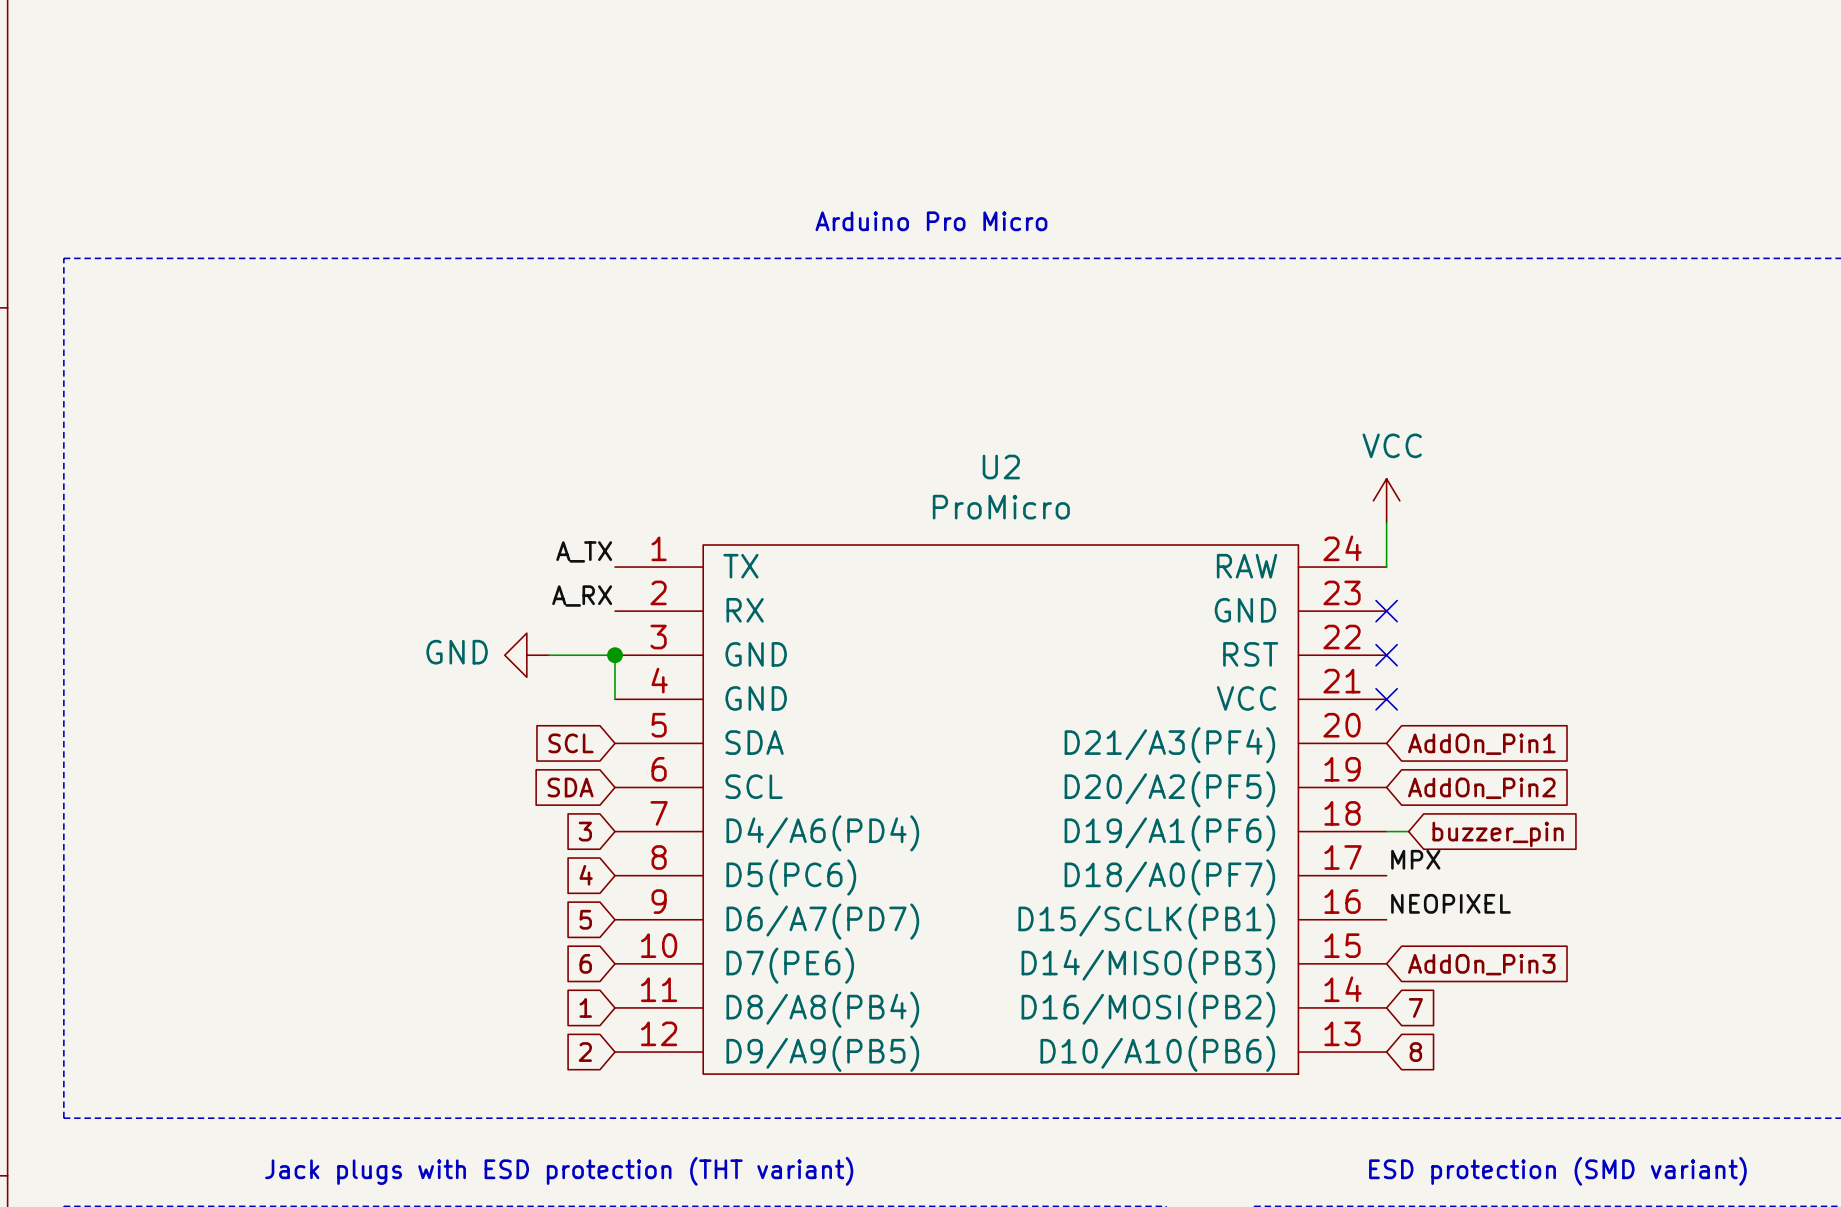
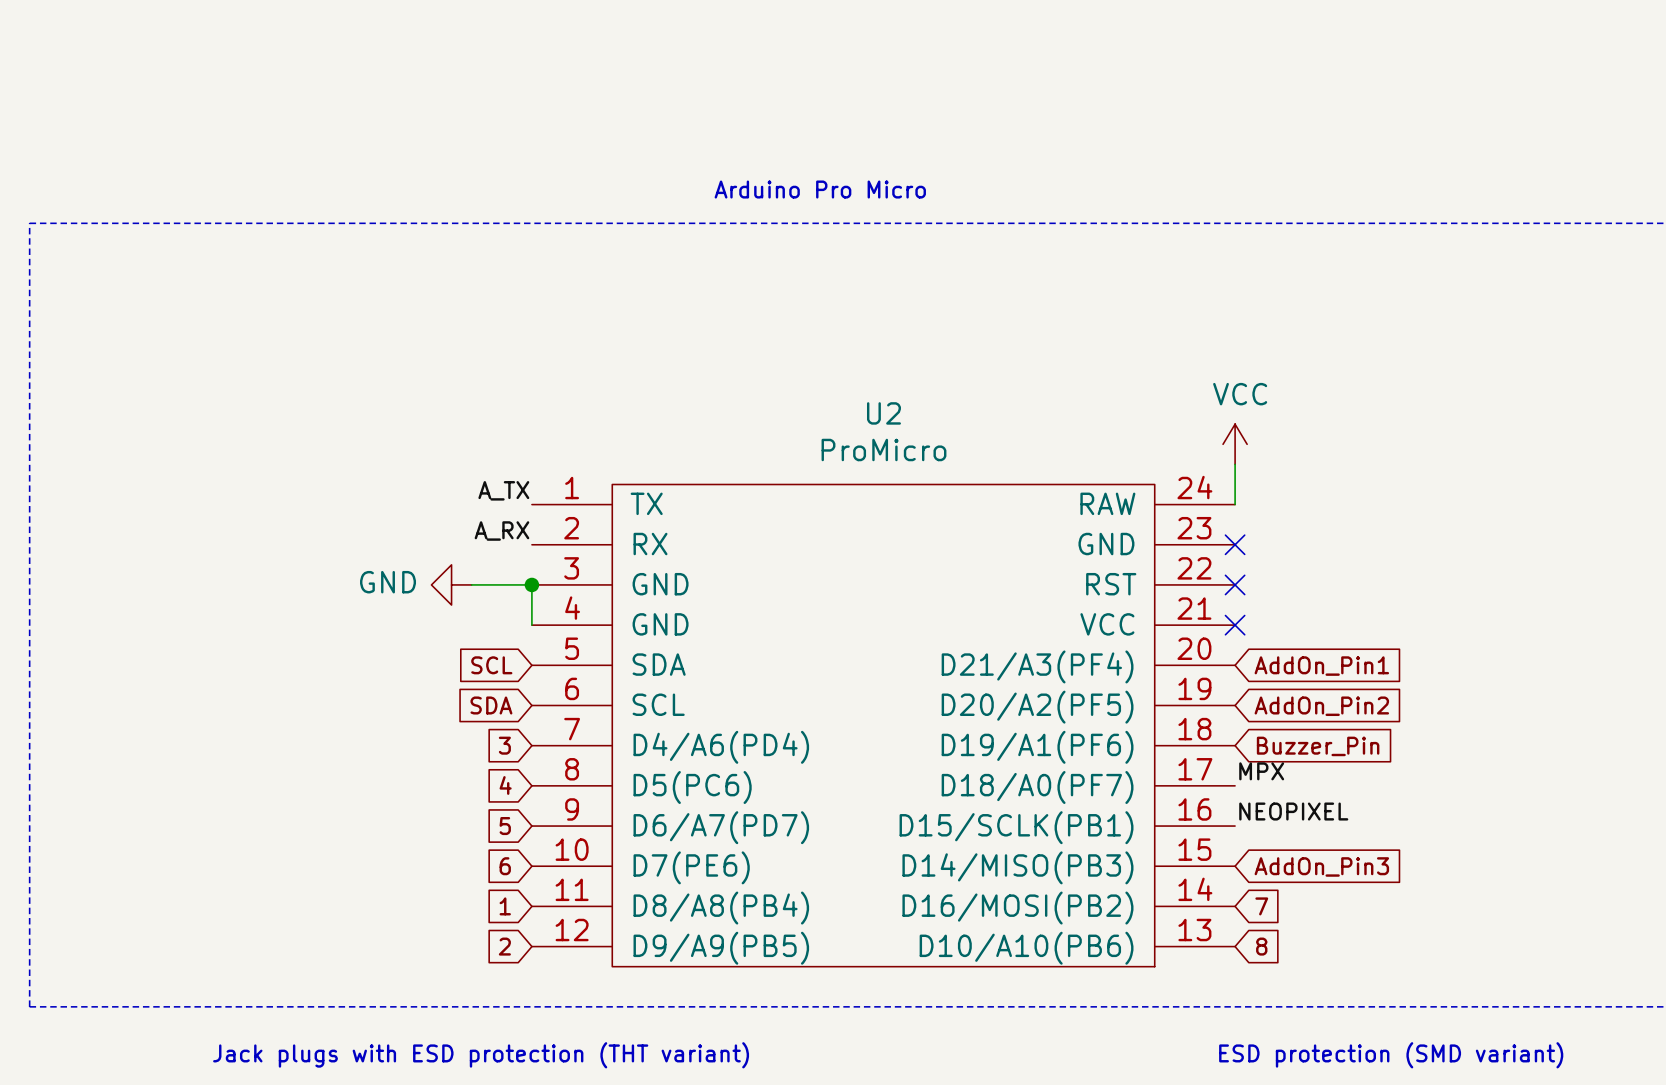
wire: (1386, 831) (1408, 831) -> none
global label: buzzer_pin (1498, 834) -> Buzzer_Pin (1318, 746)

